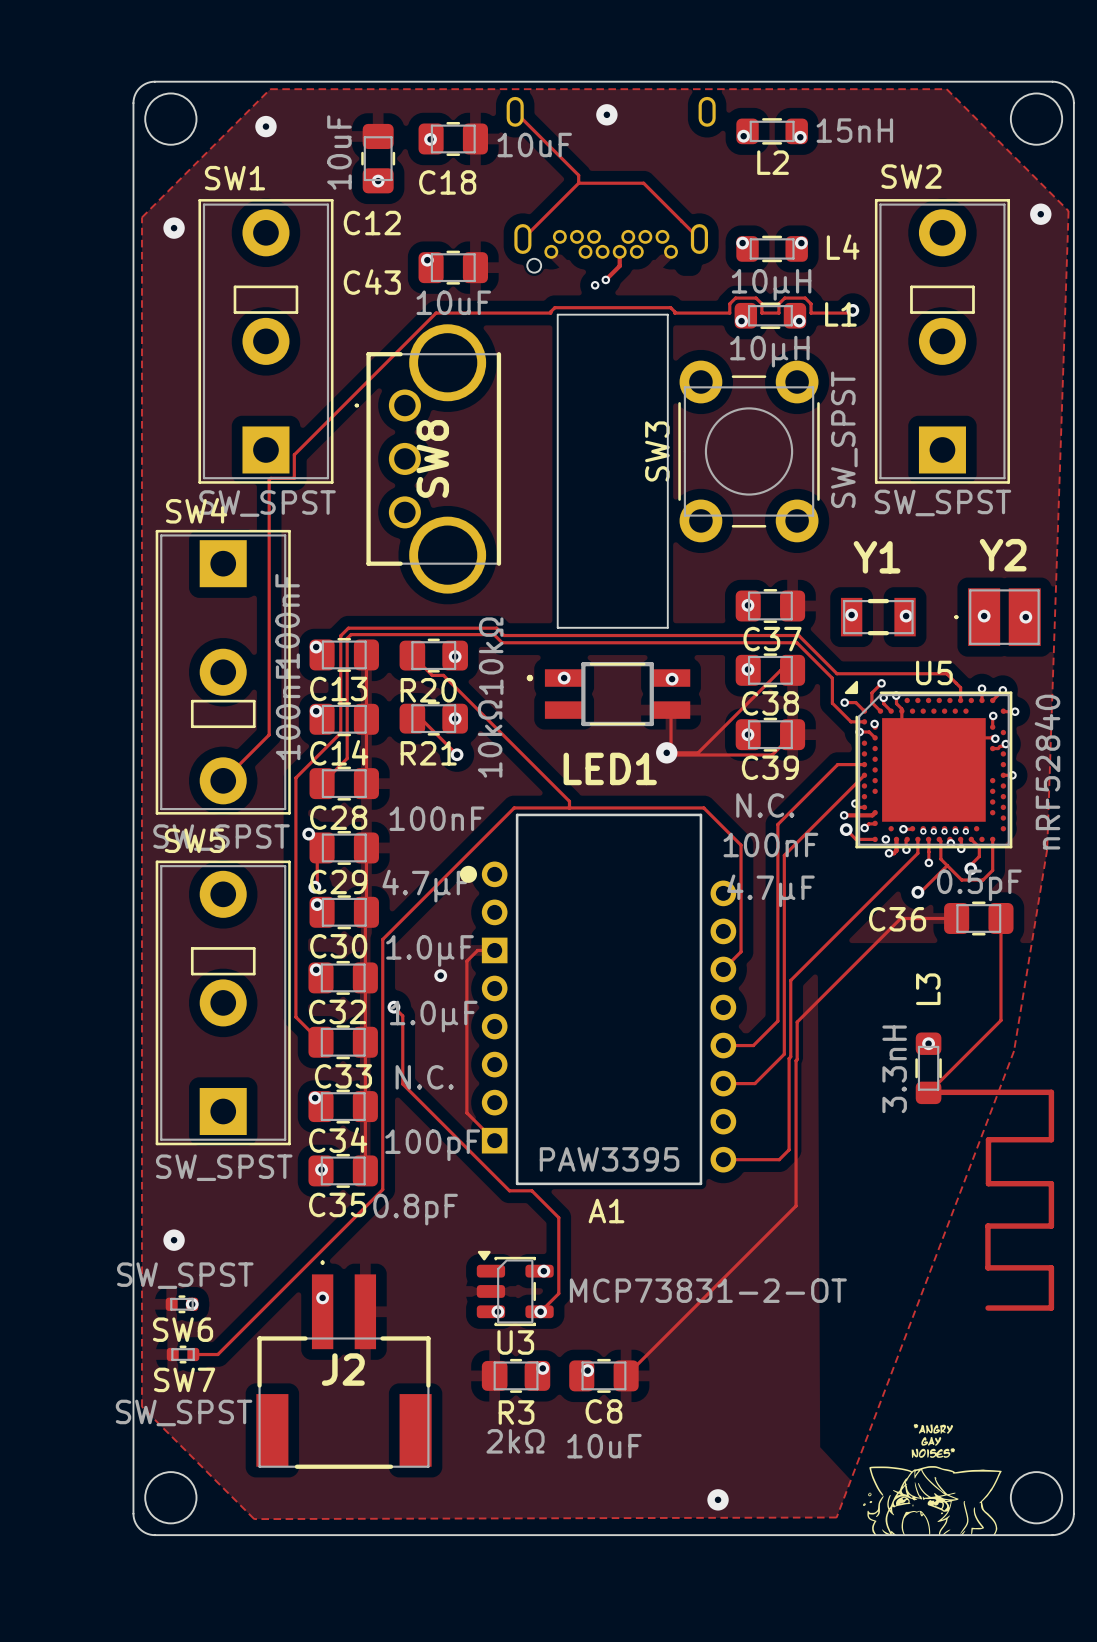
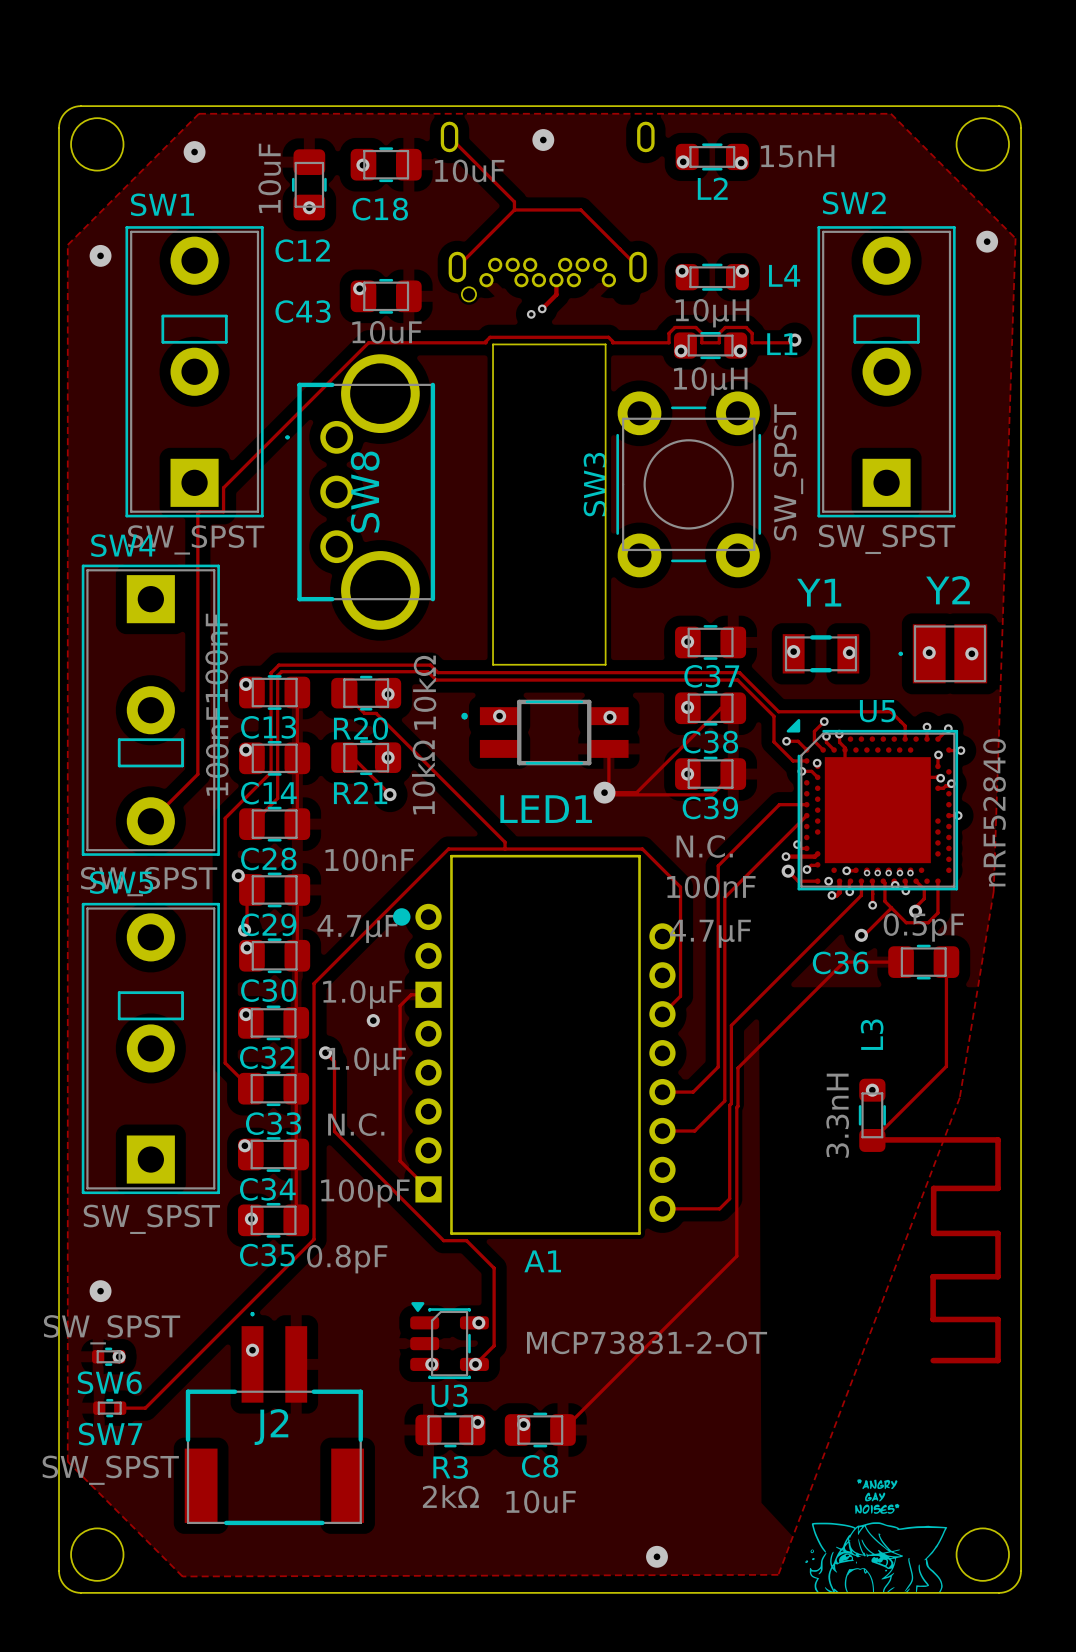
A1 value: PAW3395 (609, 1159) -> none

